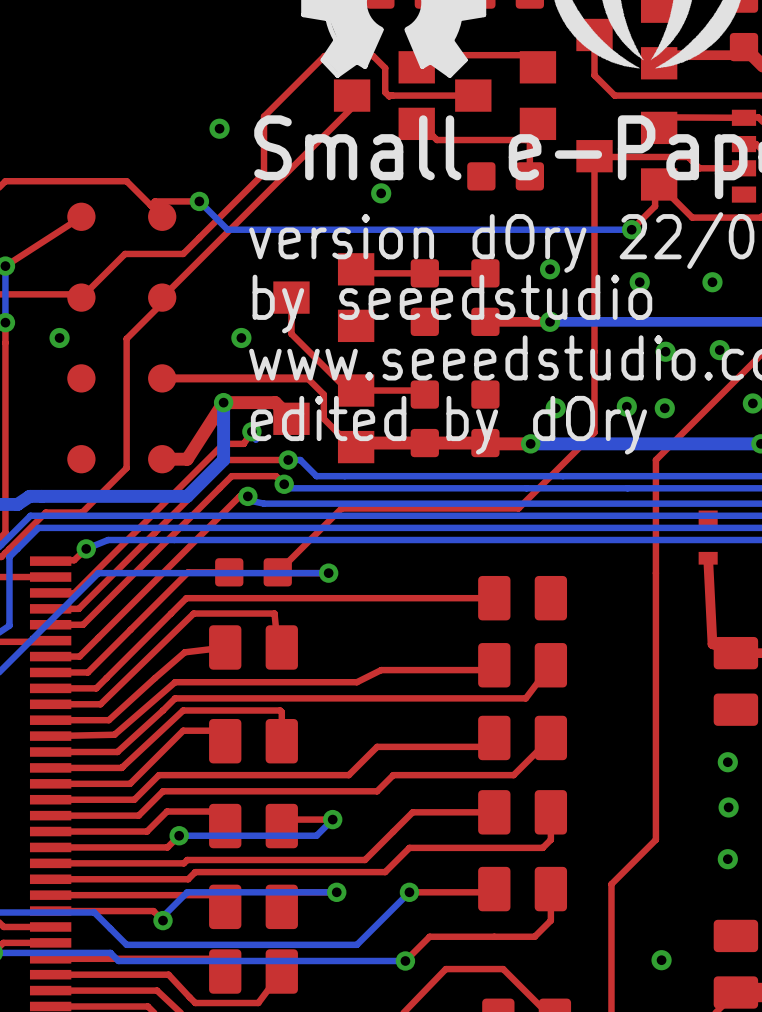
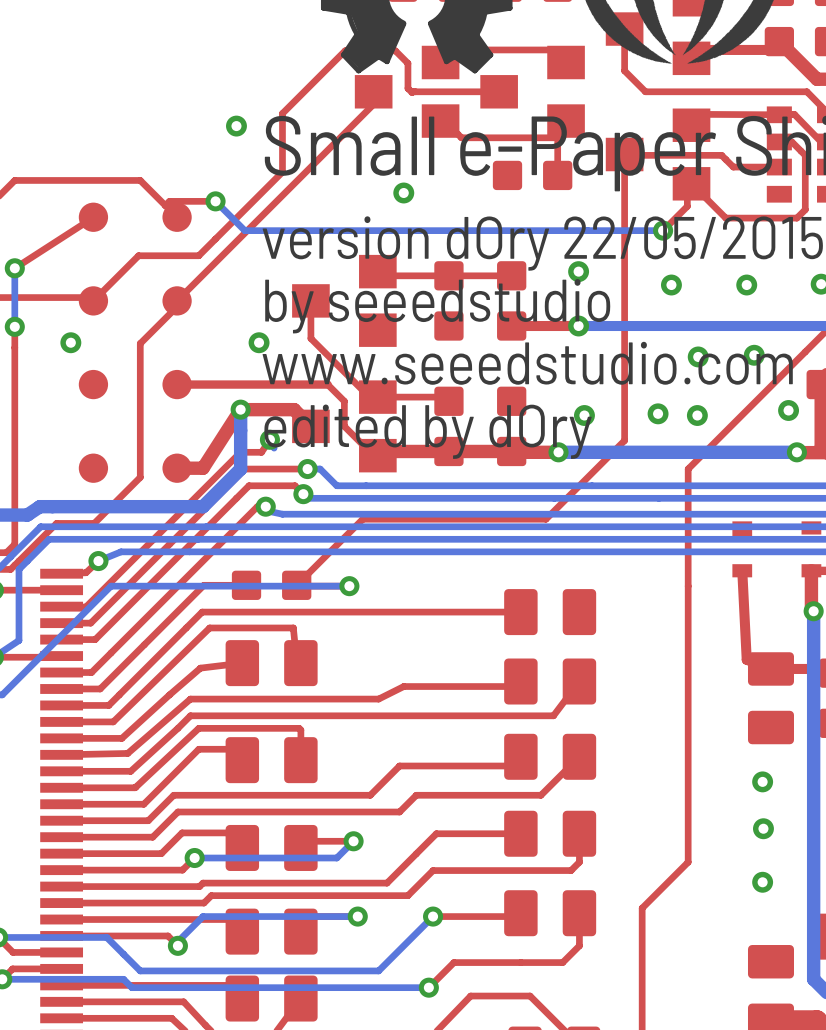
via: (661, 960) -> none

